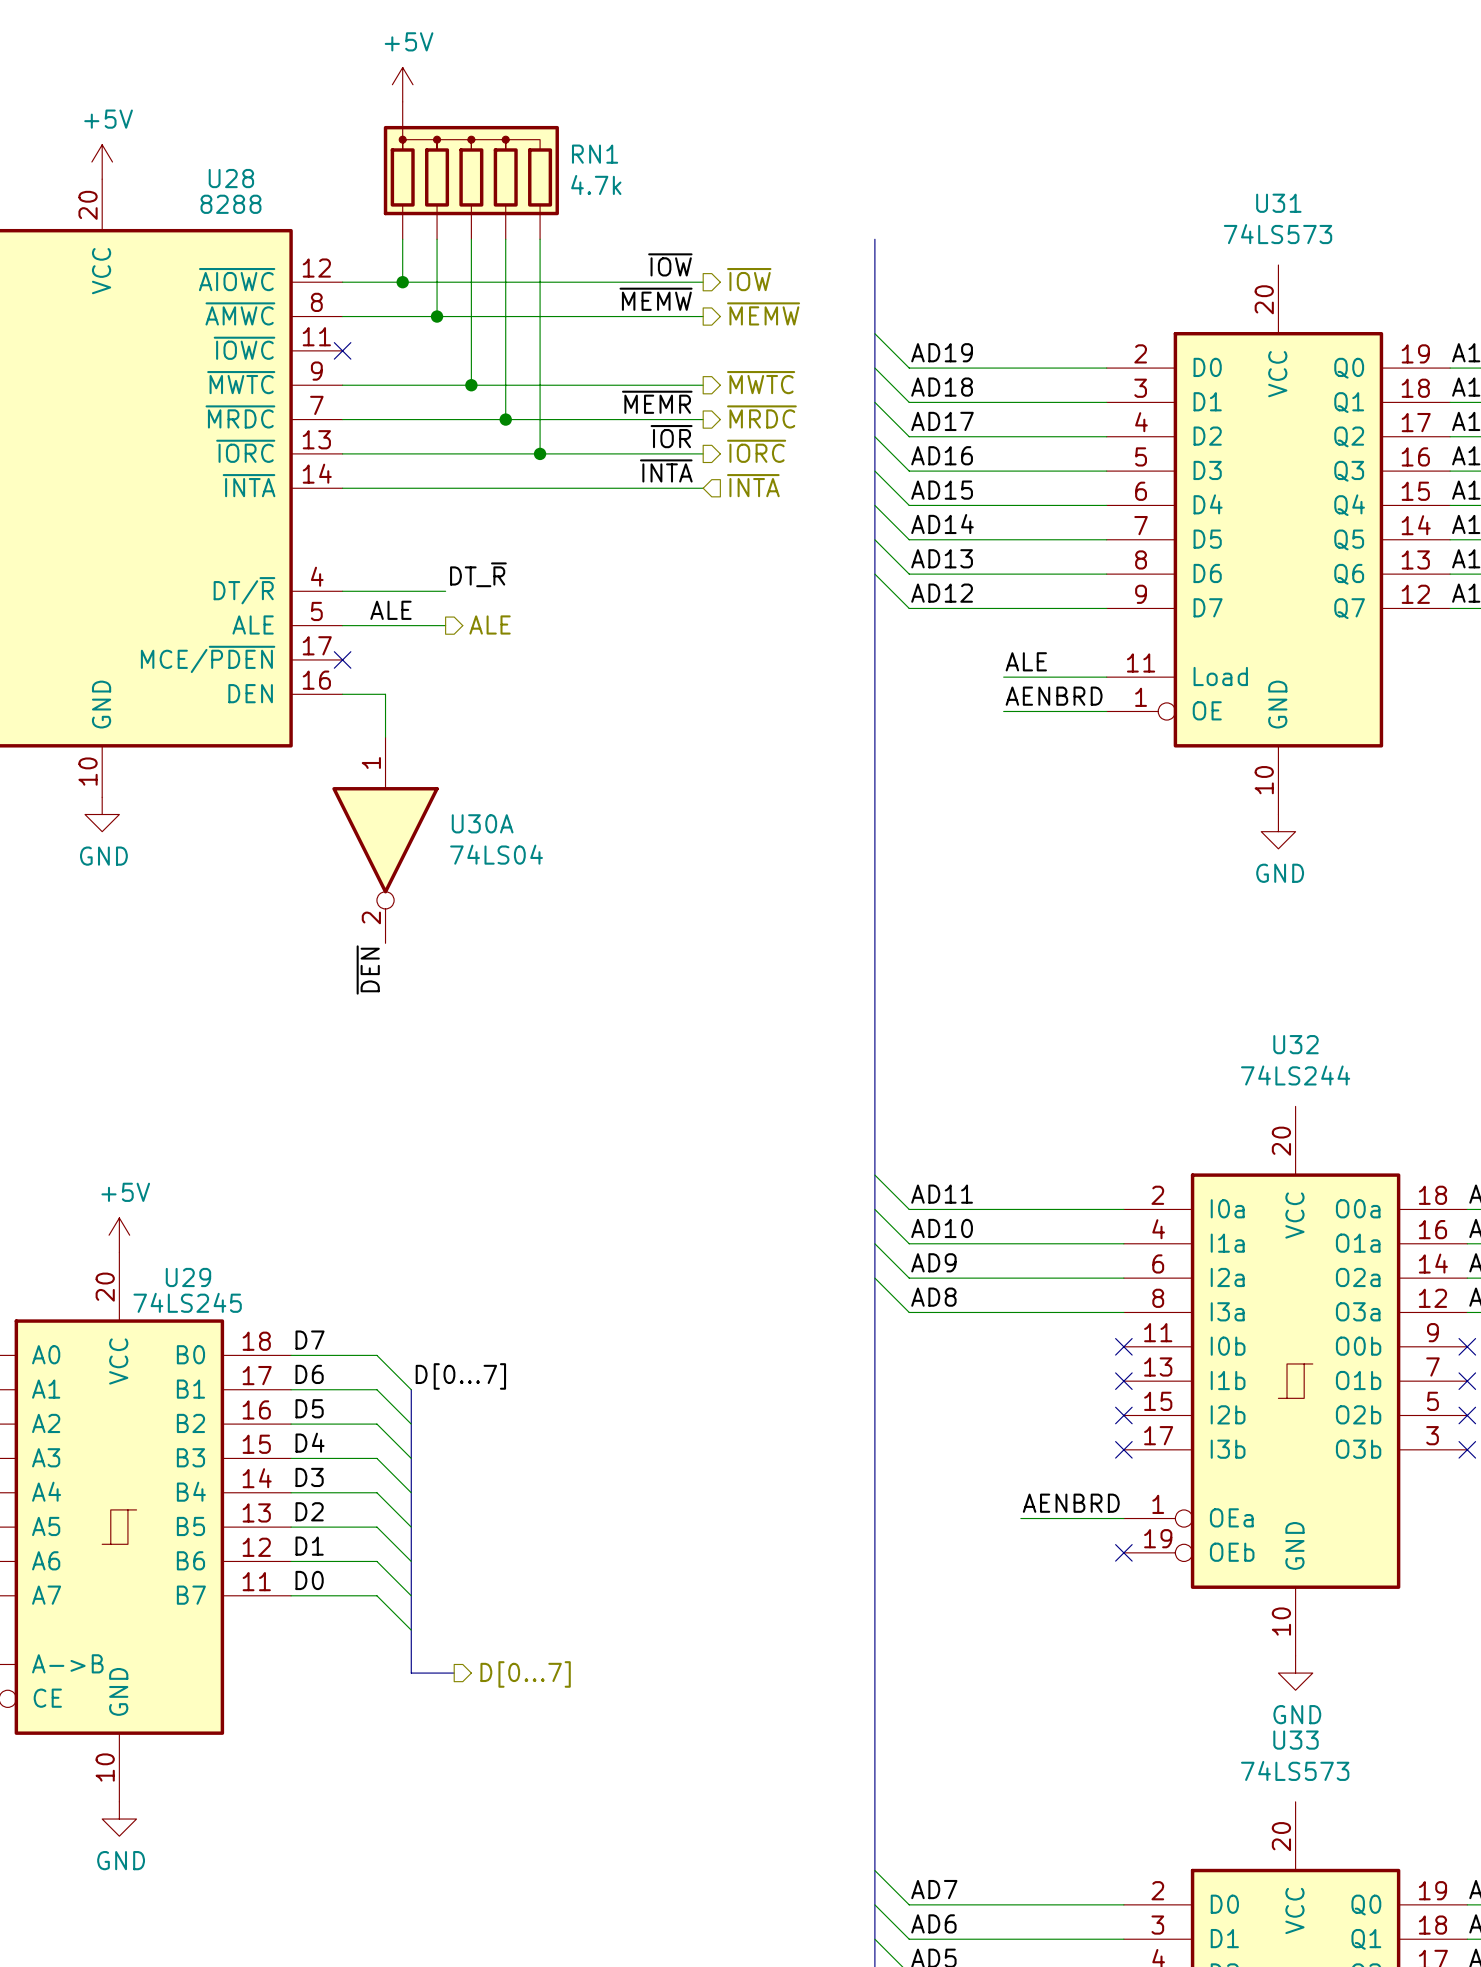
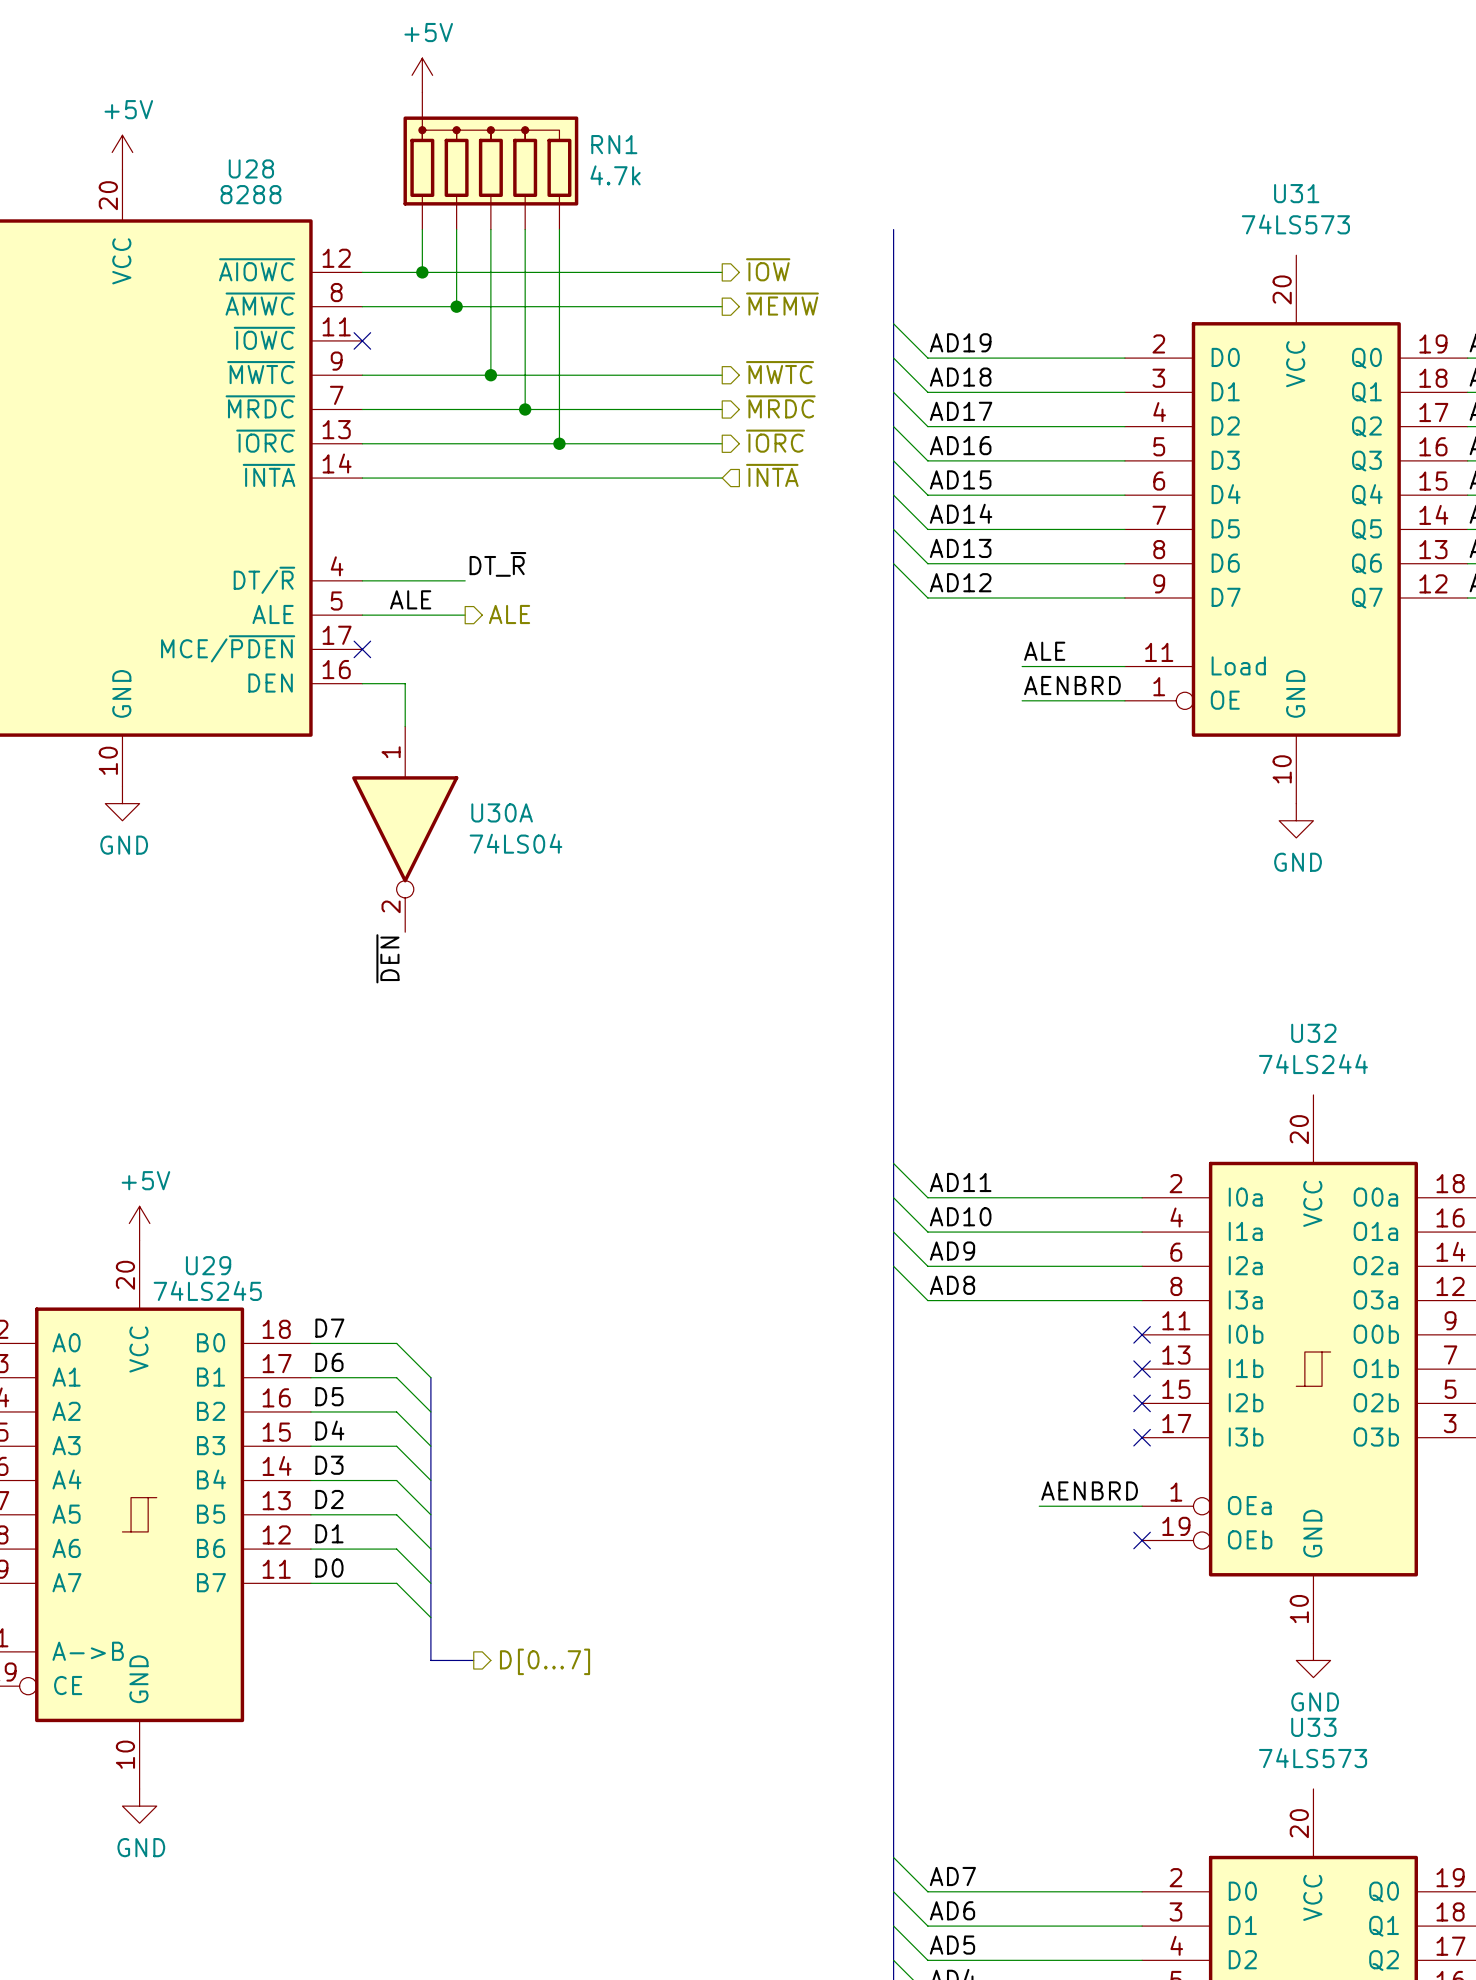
label: ~{IOW} (670, 264) -> none
label: ~{MEMW} (656, 299) -> none
label: ~{MEMR} (657, 402) -> none
label: ~{IOR} (671, 436) -> none
label: ~{INTA} (666, 470) -> none
label: D[0...7] (460, 1376) -> none

